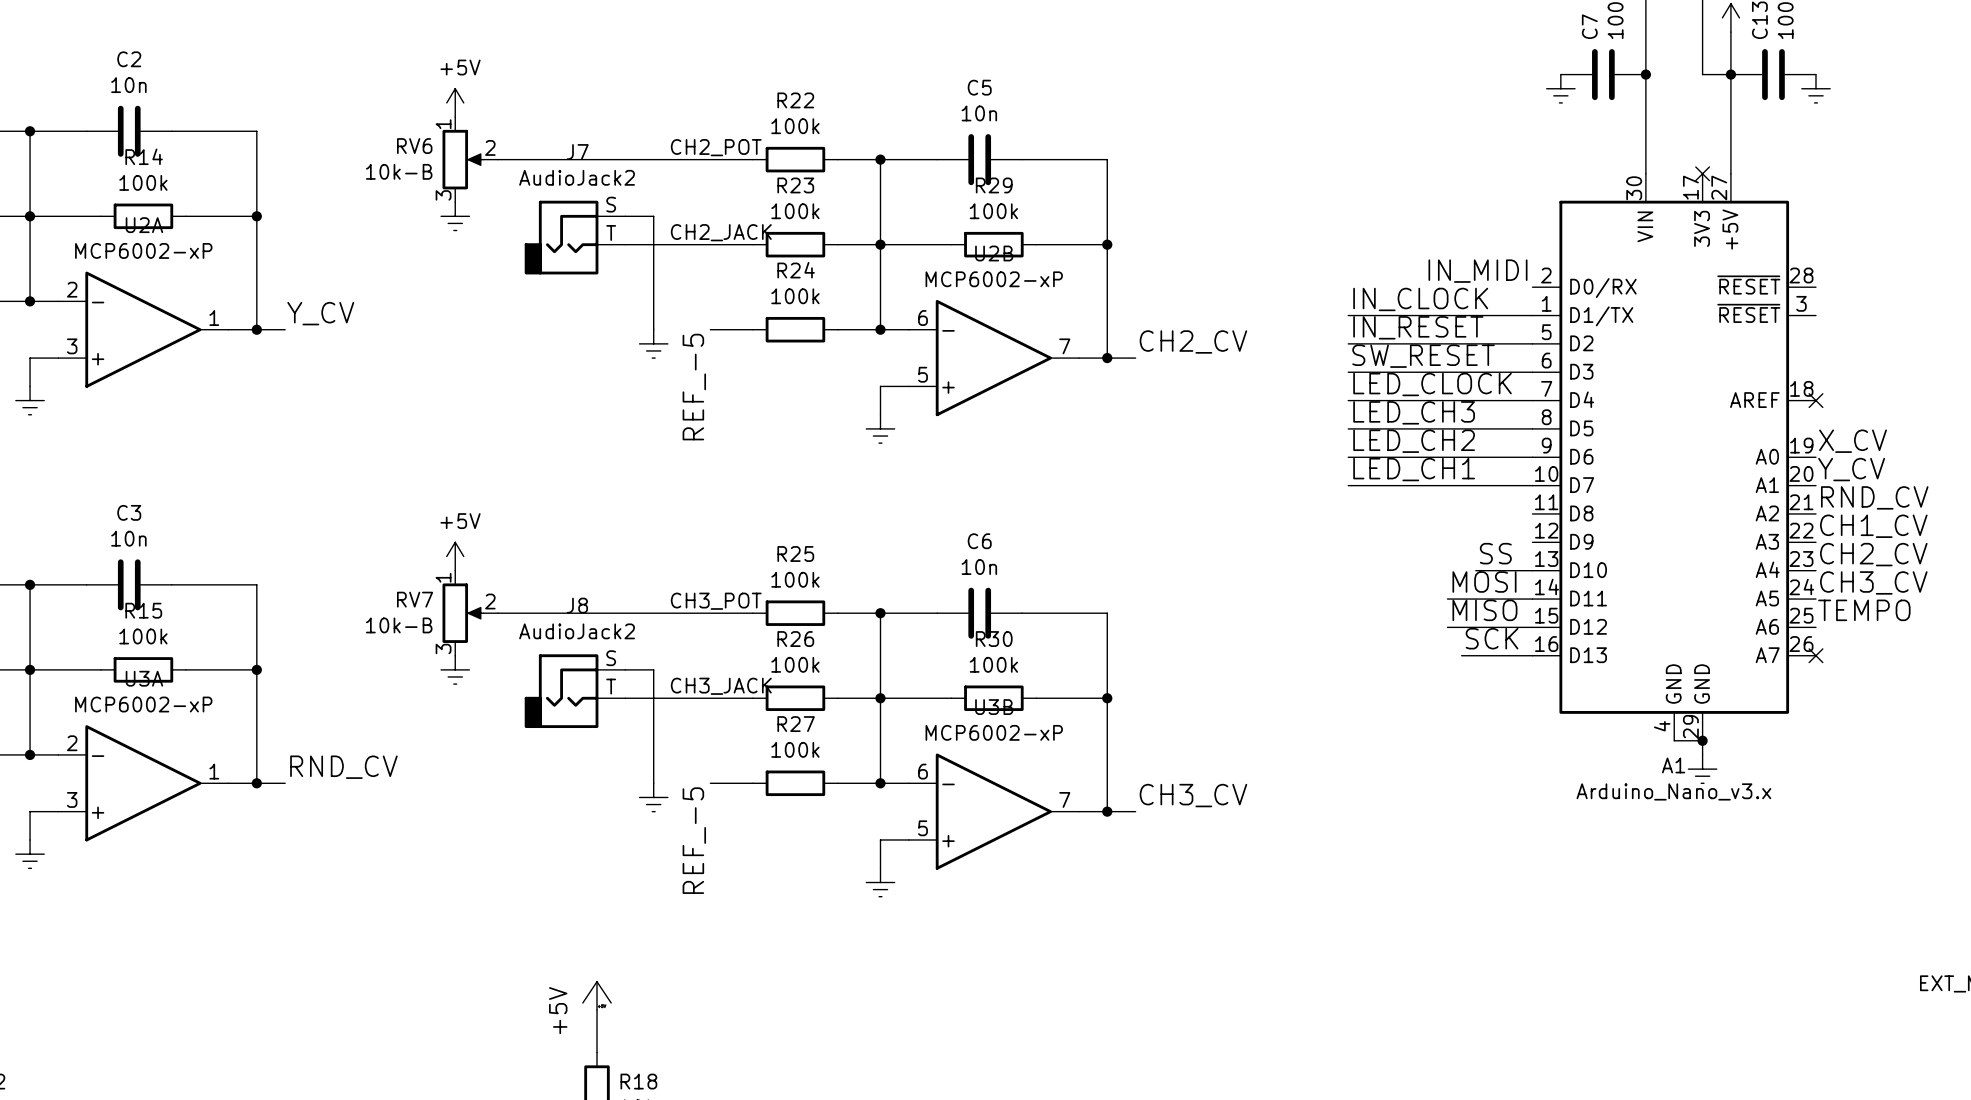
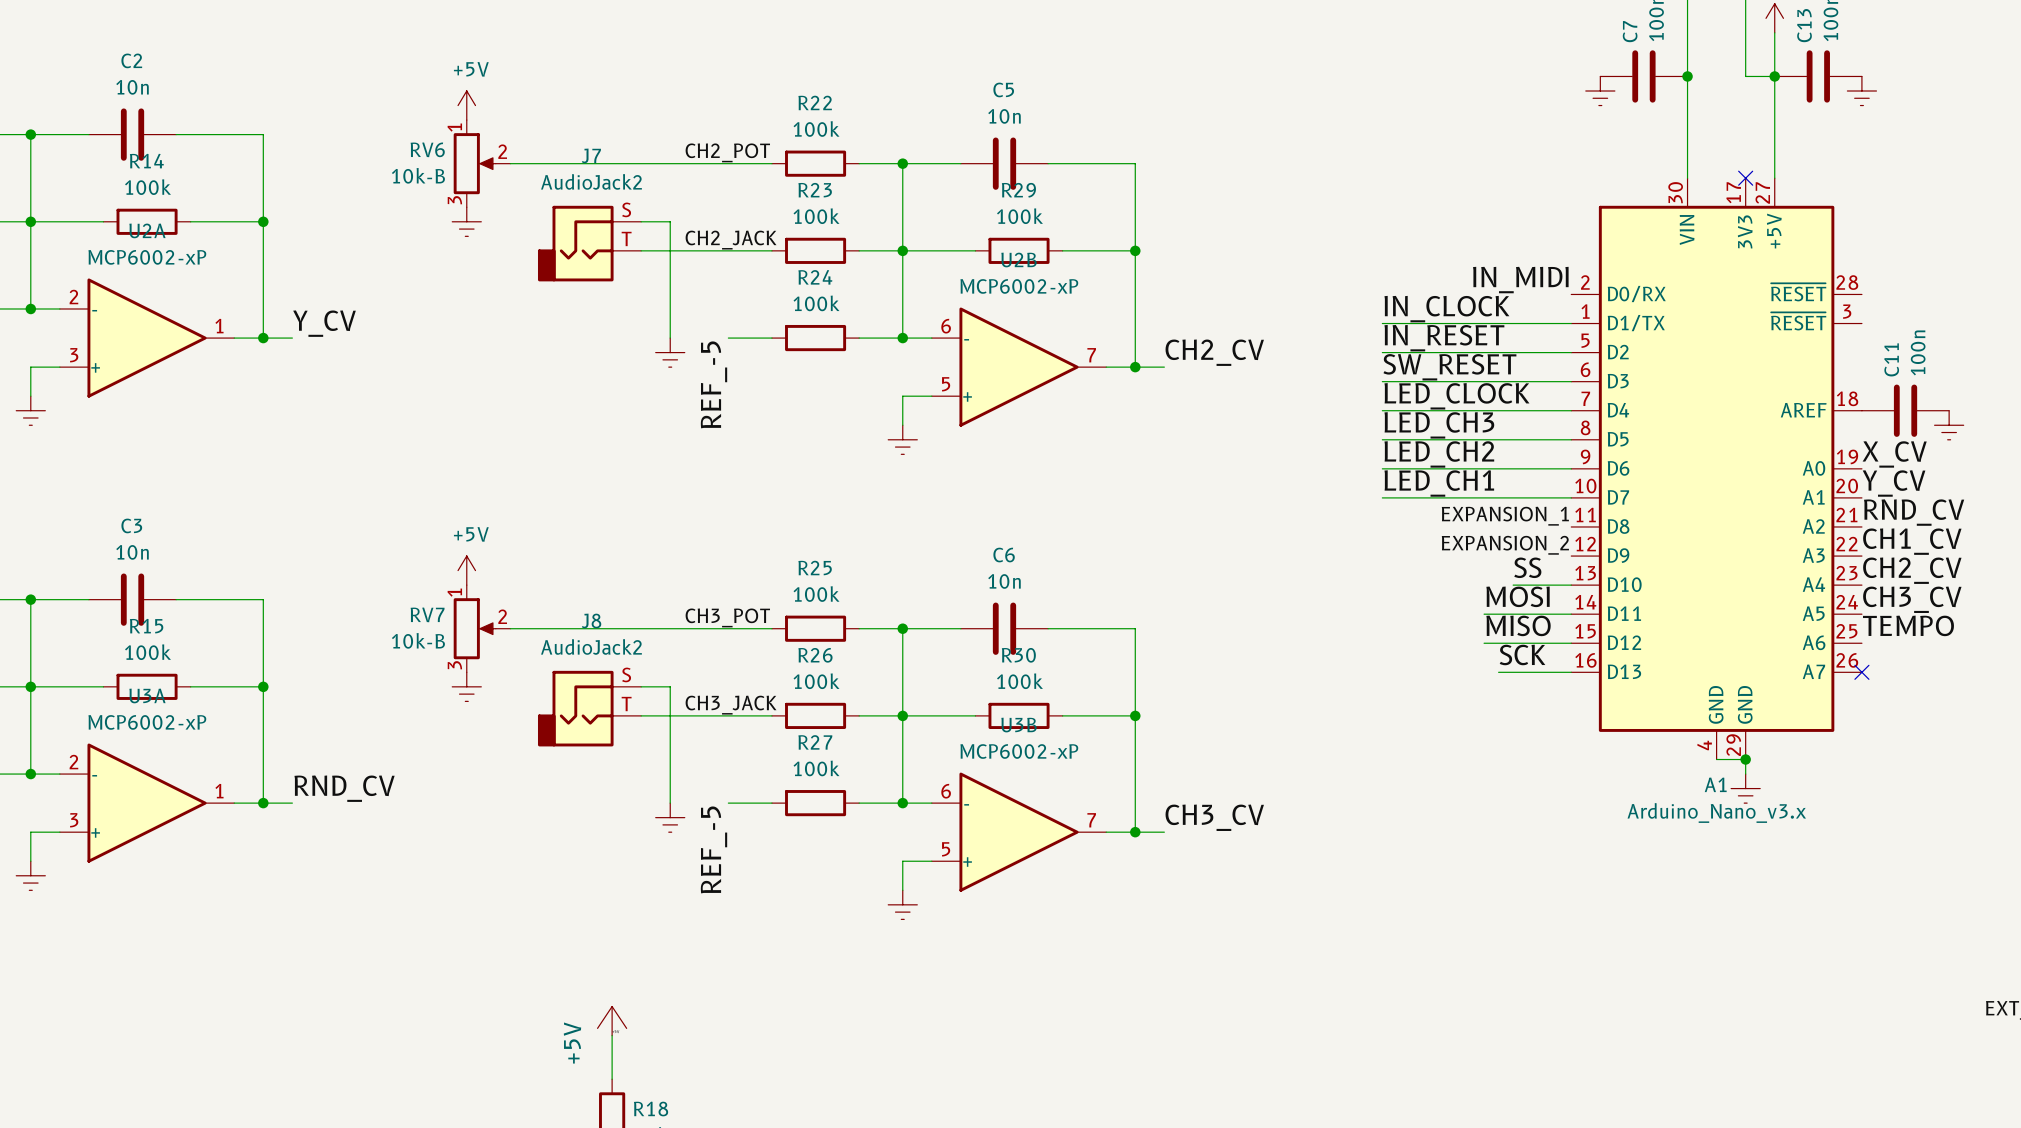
no-connect mark: (1815, 400) -> none
C11: none -> 100n (1905, 410)
power symbol: none -> (1949, 425)
label: none -> EXPANSION_1 (1505, 516)
label: none -> EXPANSION_2 (1505, 545)

